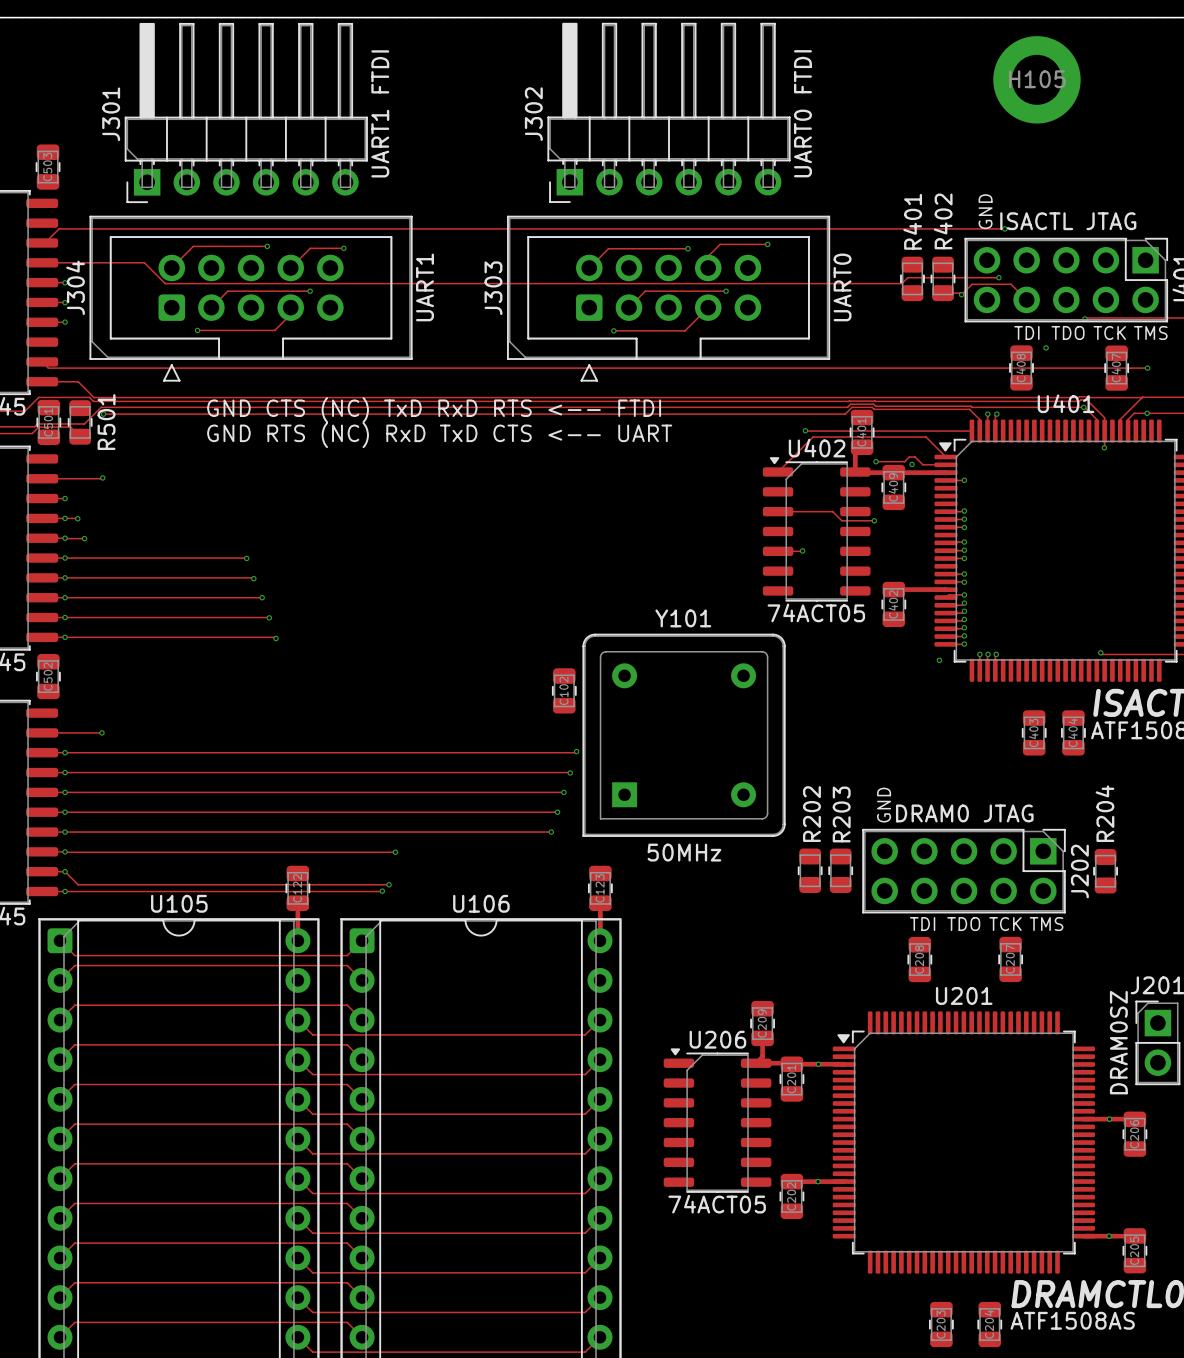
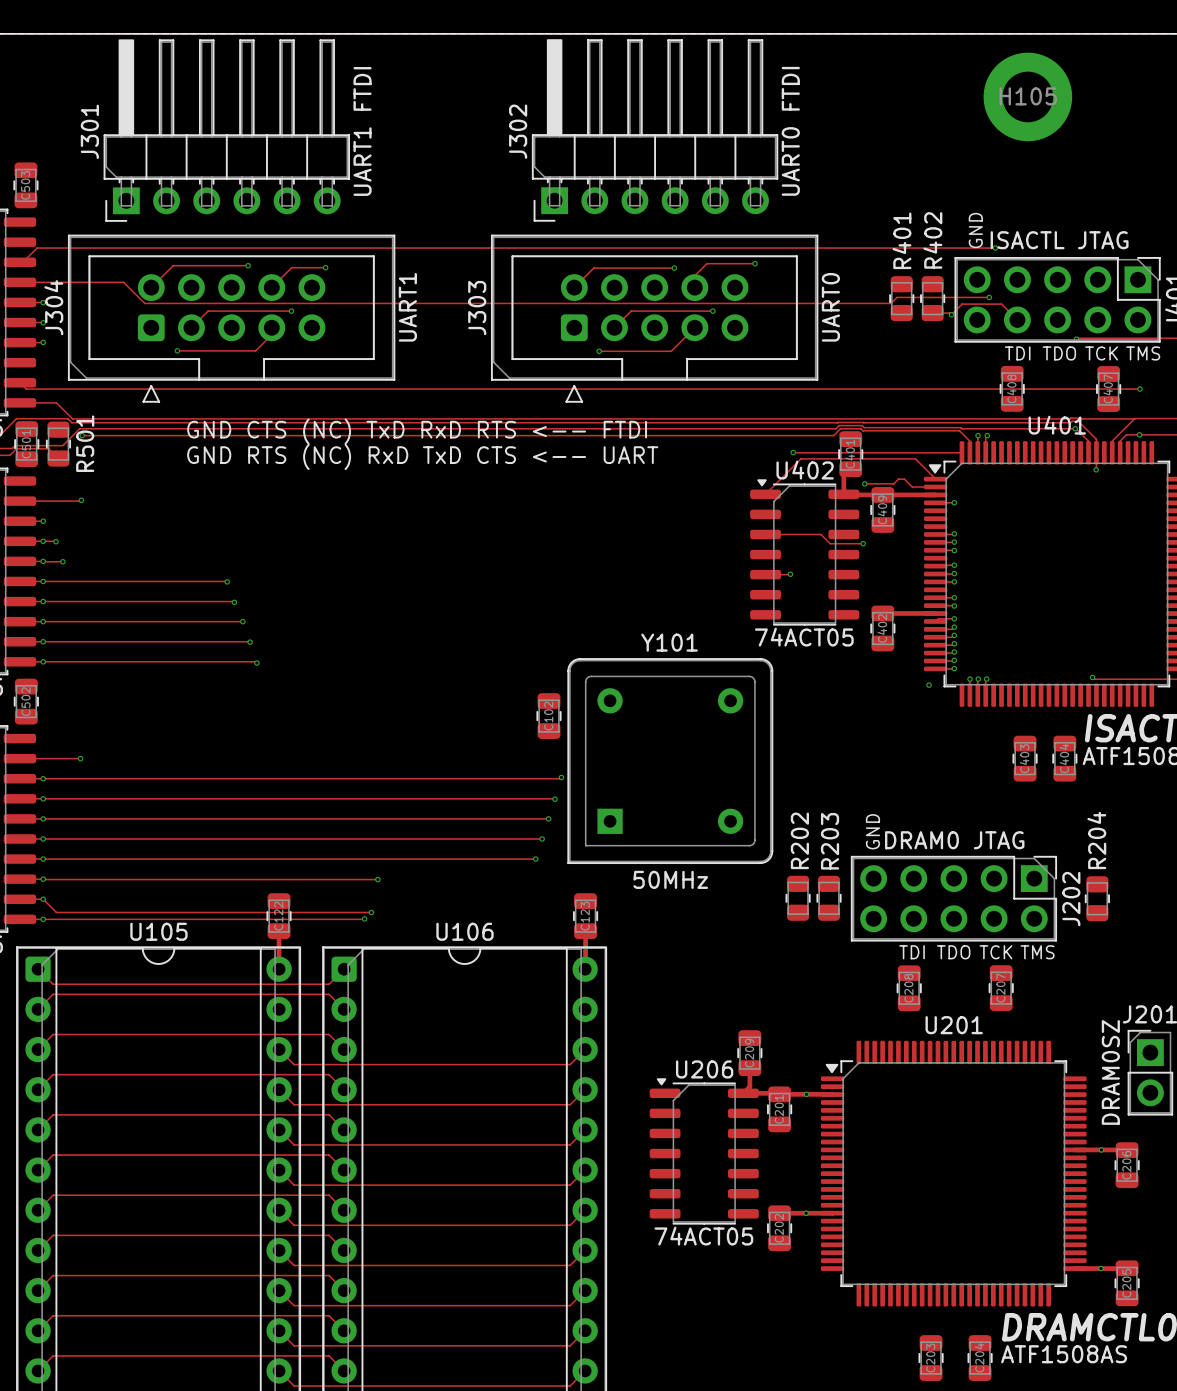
via: (1046, 347) -> none
via: (912, 464) -> none

